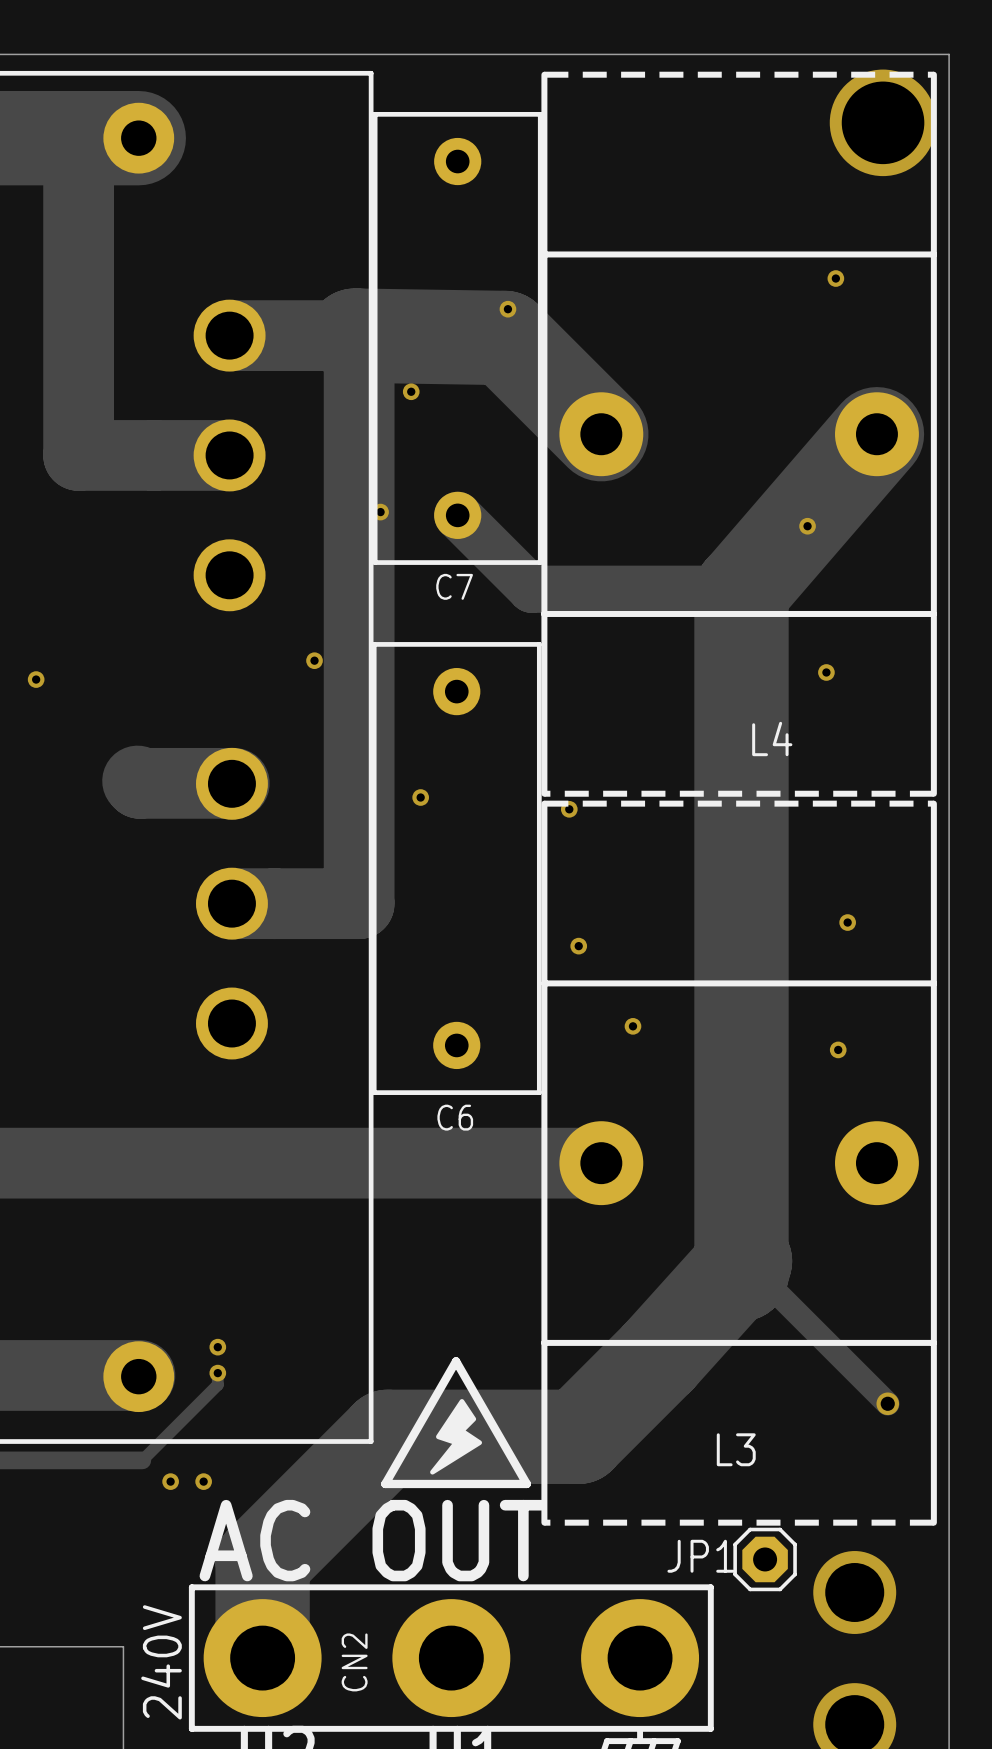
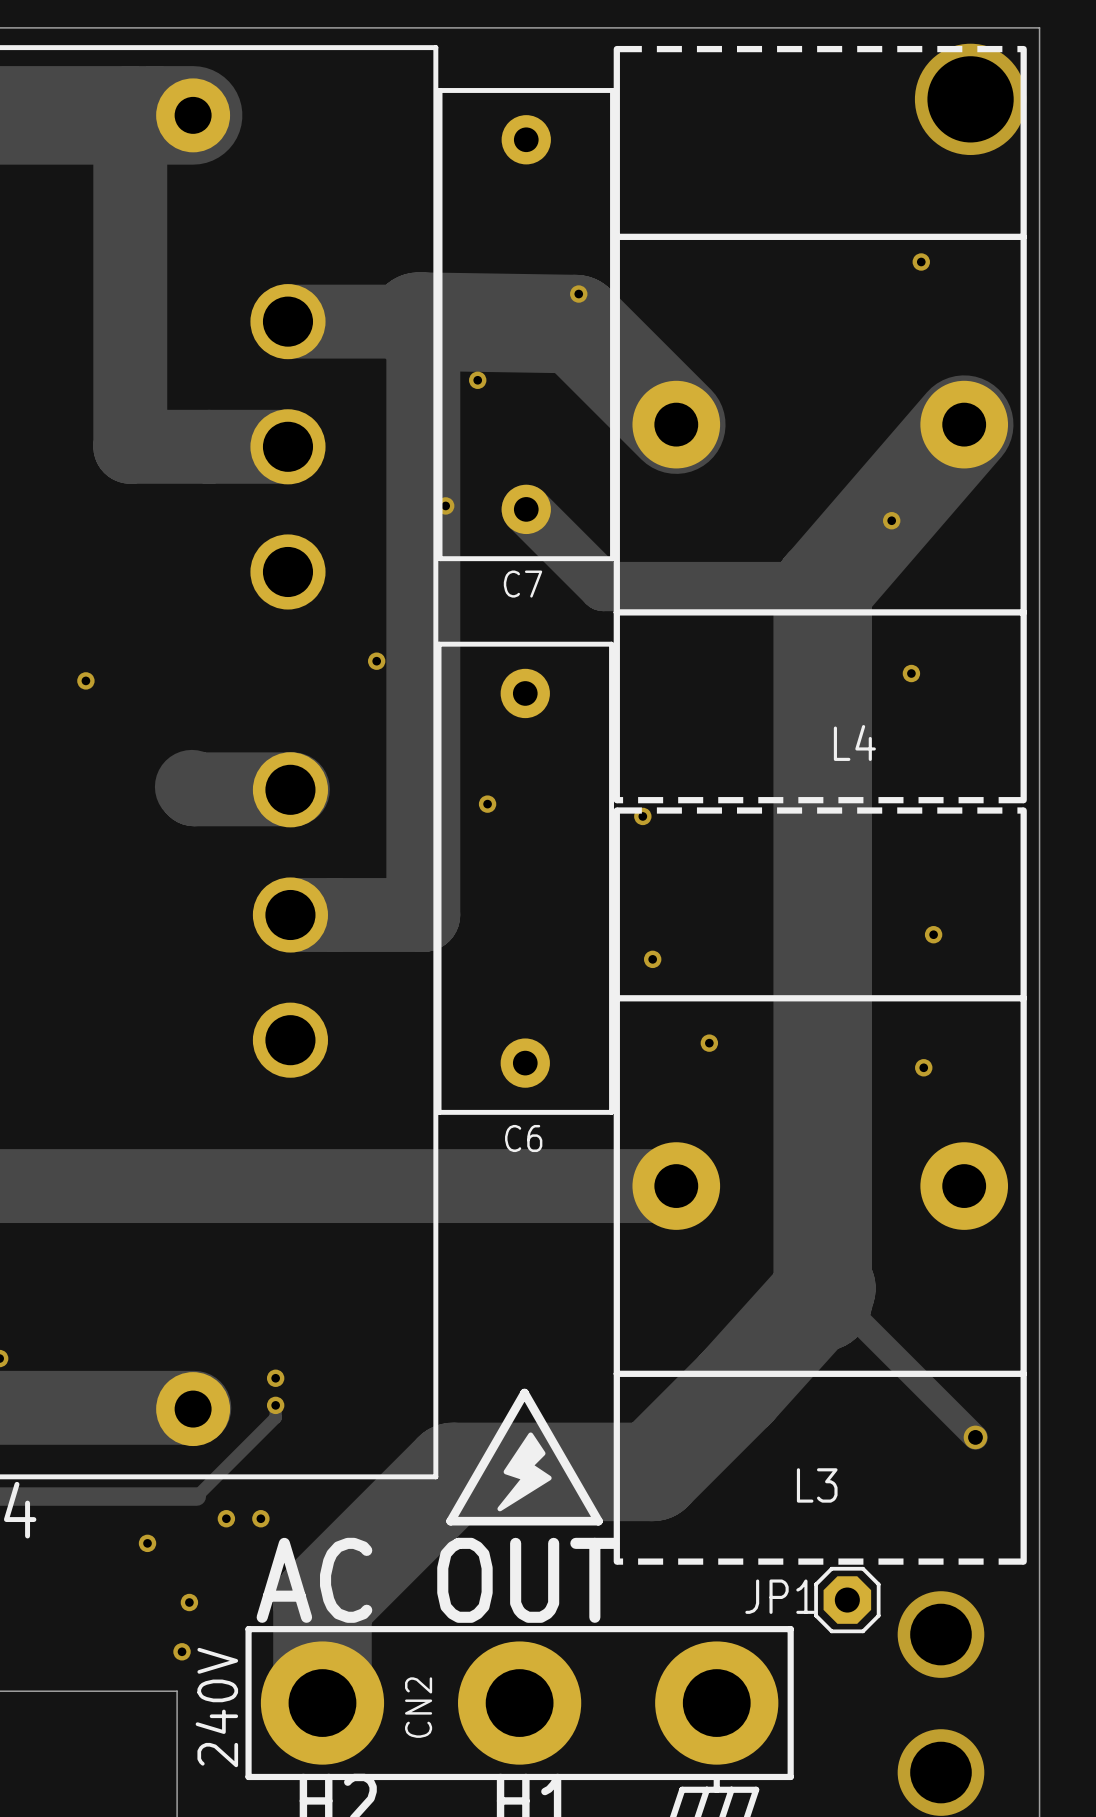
via: none -> (147, 1543)
via: none -> (189, 1602)
via: none -> (182, 1651)

